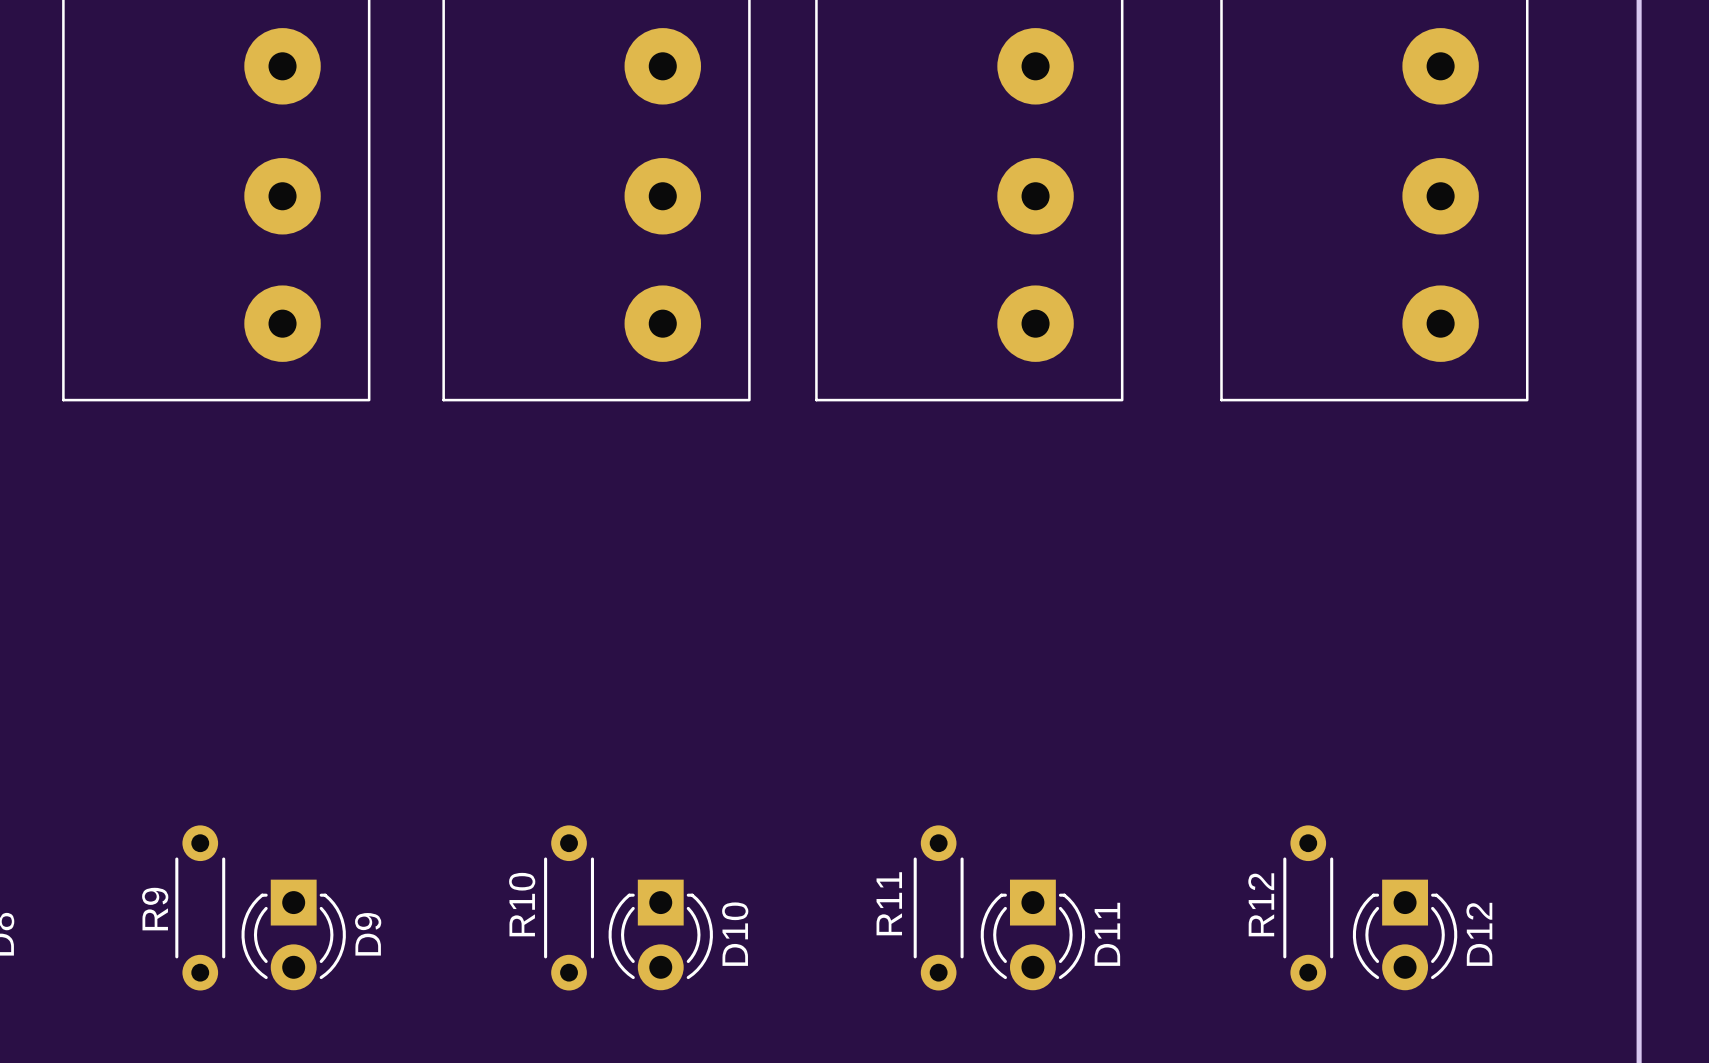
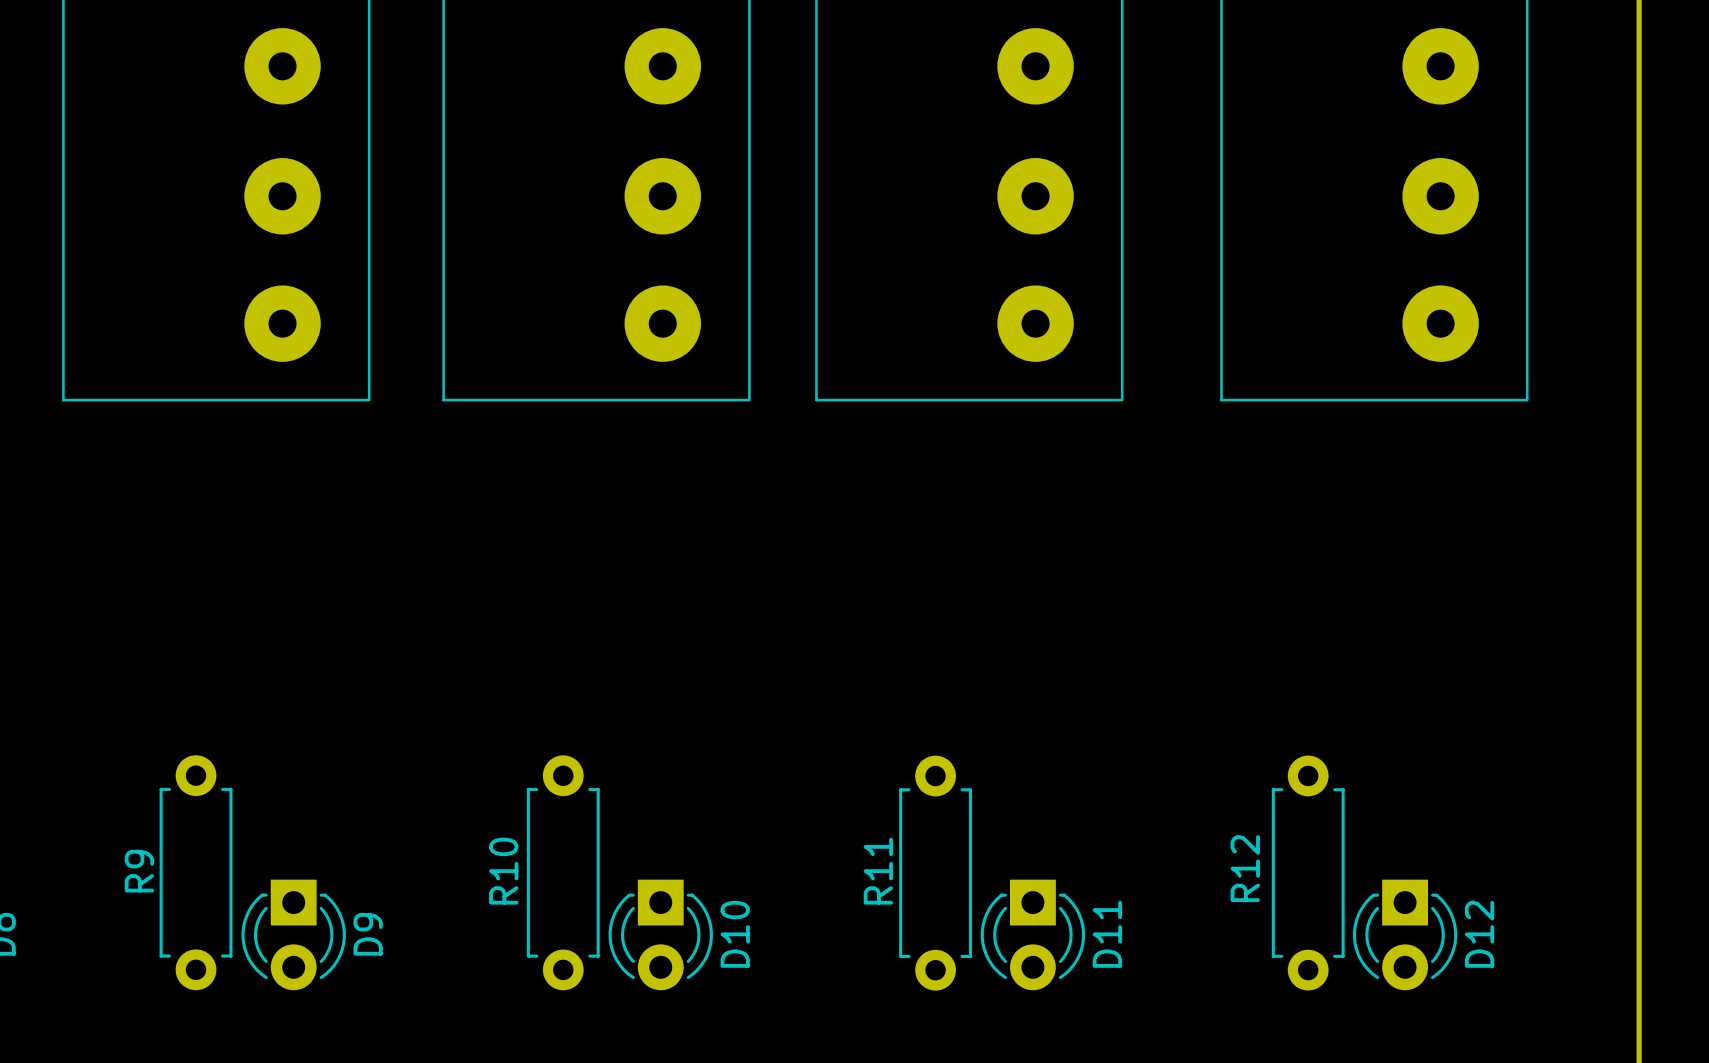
R9 footprint: [175, 825, 226, 991] -> [159, 755, 233, 991]
R10 footprint: [544, 825, 595, 991] -> [526, 755, 600, 991]
R11 footprint: [913, 825, 964, 991] -> [899, 755, 973, 991]
R12 footprint: [1283, 825, 1334, 991] -> [1271, 755, 1345, 991]

